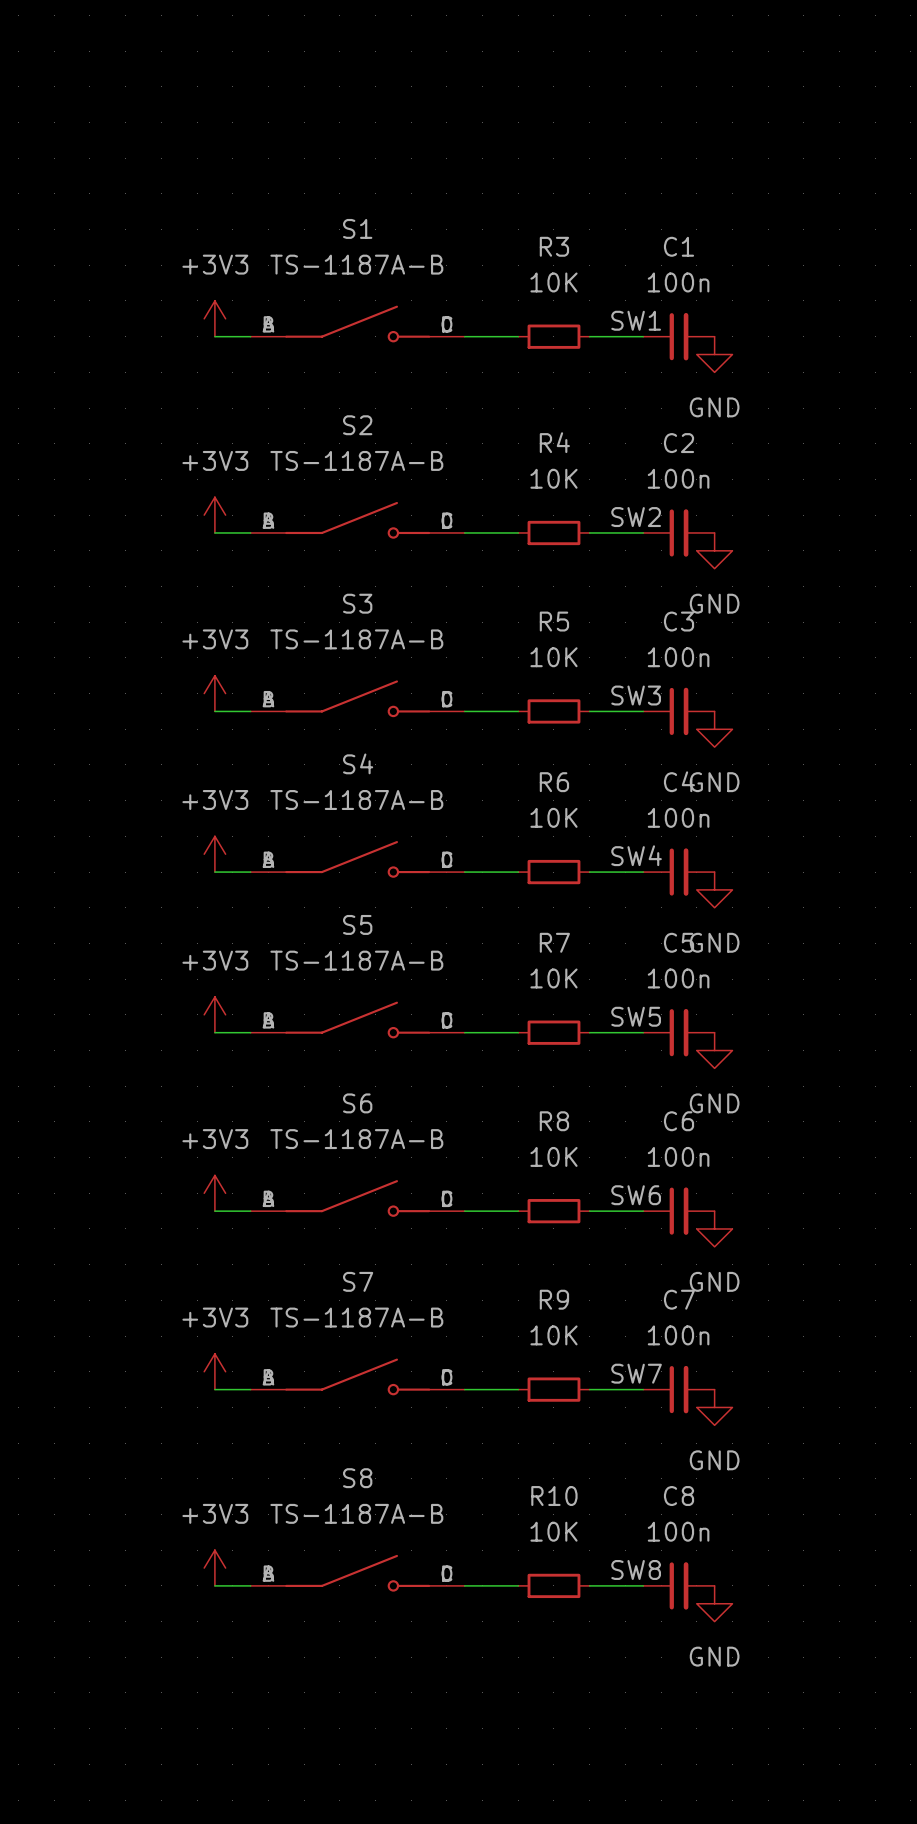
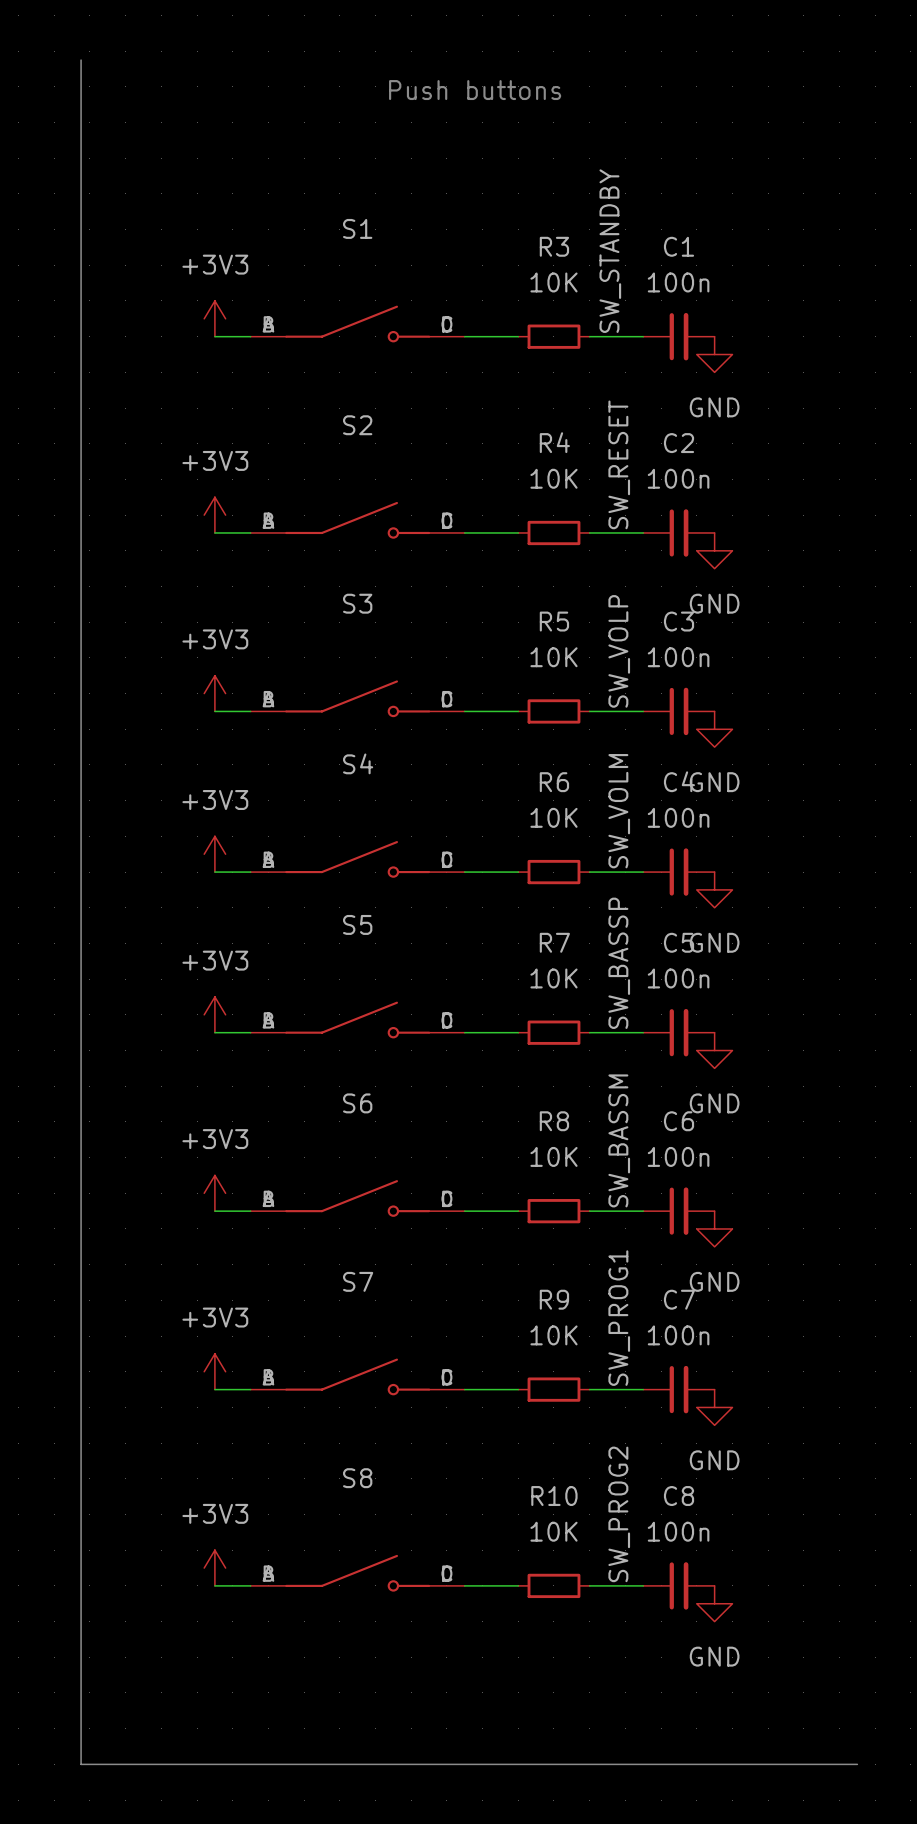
line: none -> (81, 60) (81, 1764) (857, 1764)
text: none -> Push buttons (475, 90)
S1 value: TS-1187A-B (356, 264) -> none
label: SW1 (636, 320) -> SW_STANDBY (610, 251)
S2 value: TS-1187A-B (356, 460) -> none
label: none -> SW_RESET (619, 464)
label: SW2 (636, 517) -> none
S3 value: TS-1187A-B (356, 639) -> none
label: none -> SW_VOLP (619, 651)
label: SW3 (636, 695) -> none
S4 value: TS-1187A-B (356, 800) -> none
label: none -> SW_VOLM (619, 811)
label: SW4 (636, 855) -> none
S5 value: TS-1187A-B (356, 960) -> none
label: none -> SW_BASSP (619, 963)
label: SW5 (636, 1016) -> none
S6 value: TS-1187A-B (356, 1139) -> none
label: none -> SW_BASSM (619, 1140)
label: SW6 (636, 1195) -> none
S7 value: TS-1187A-B (356, 1317) -> none
label: none -> SW_PROG1 (619, 1318)
label: SW7 (636, 1373) -> none
S8 value: TS-1187A-B (356, 1513) -> none
label: none -> SW_PROG2 (619, 1514)
label: SW8 (636, 1569) -> none

